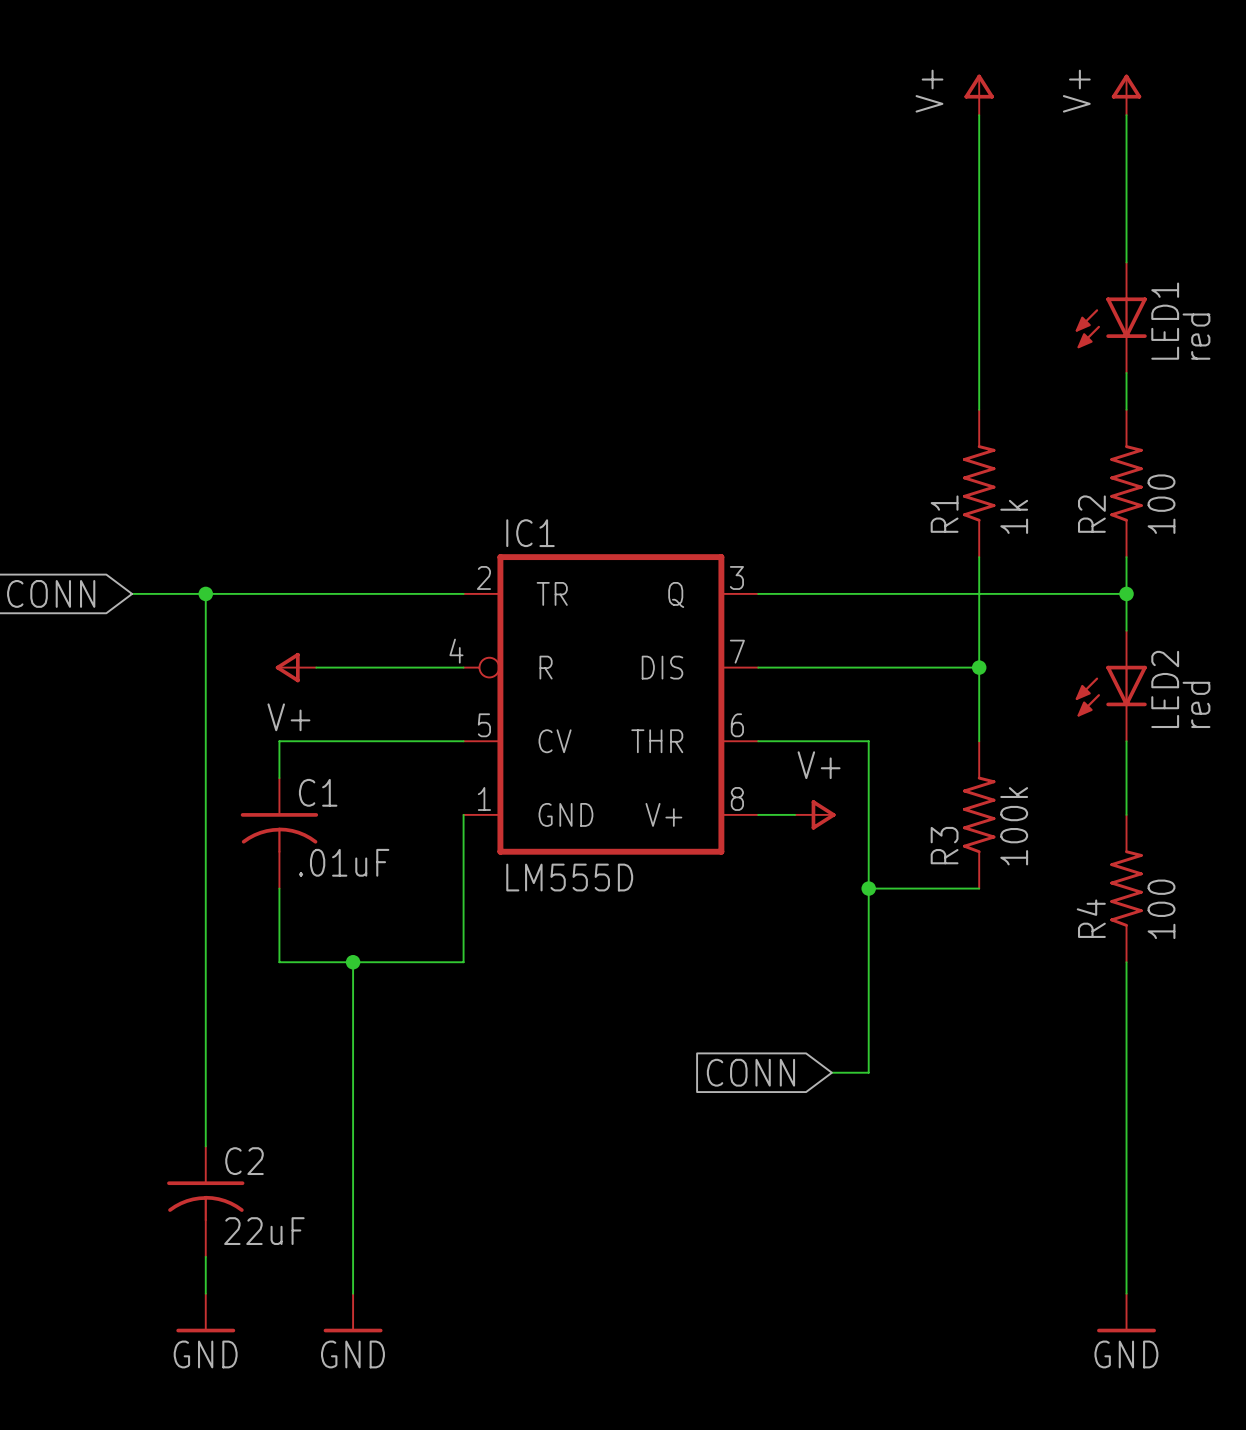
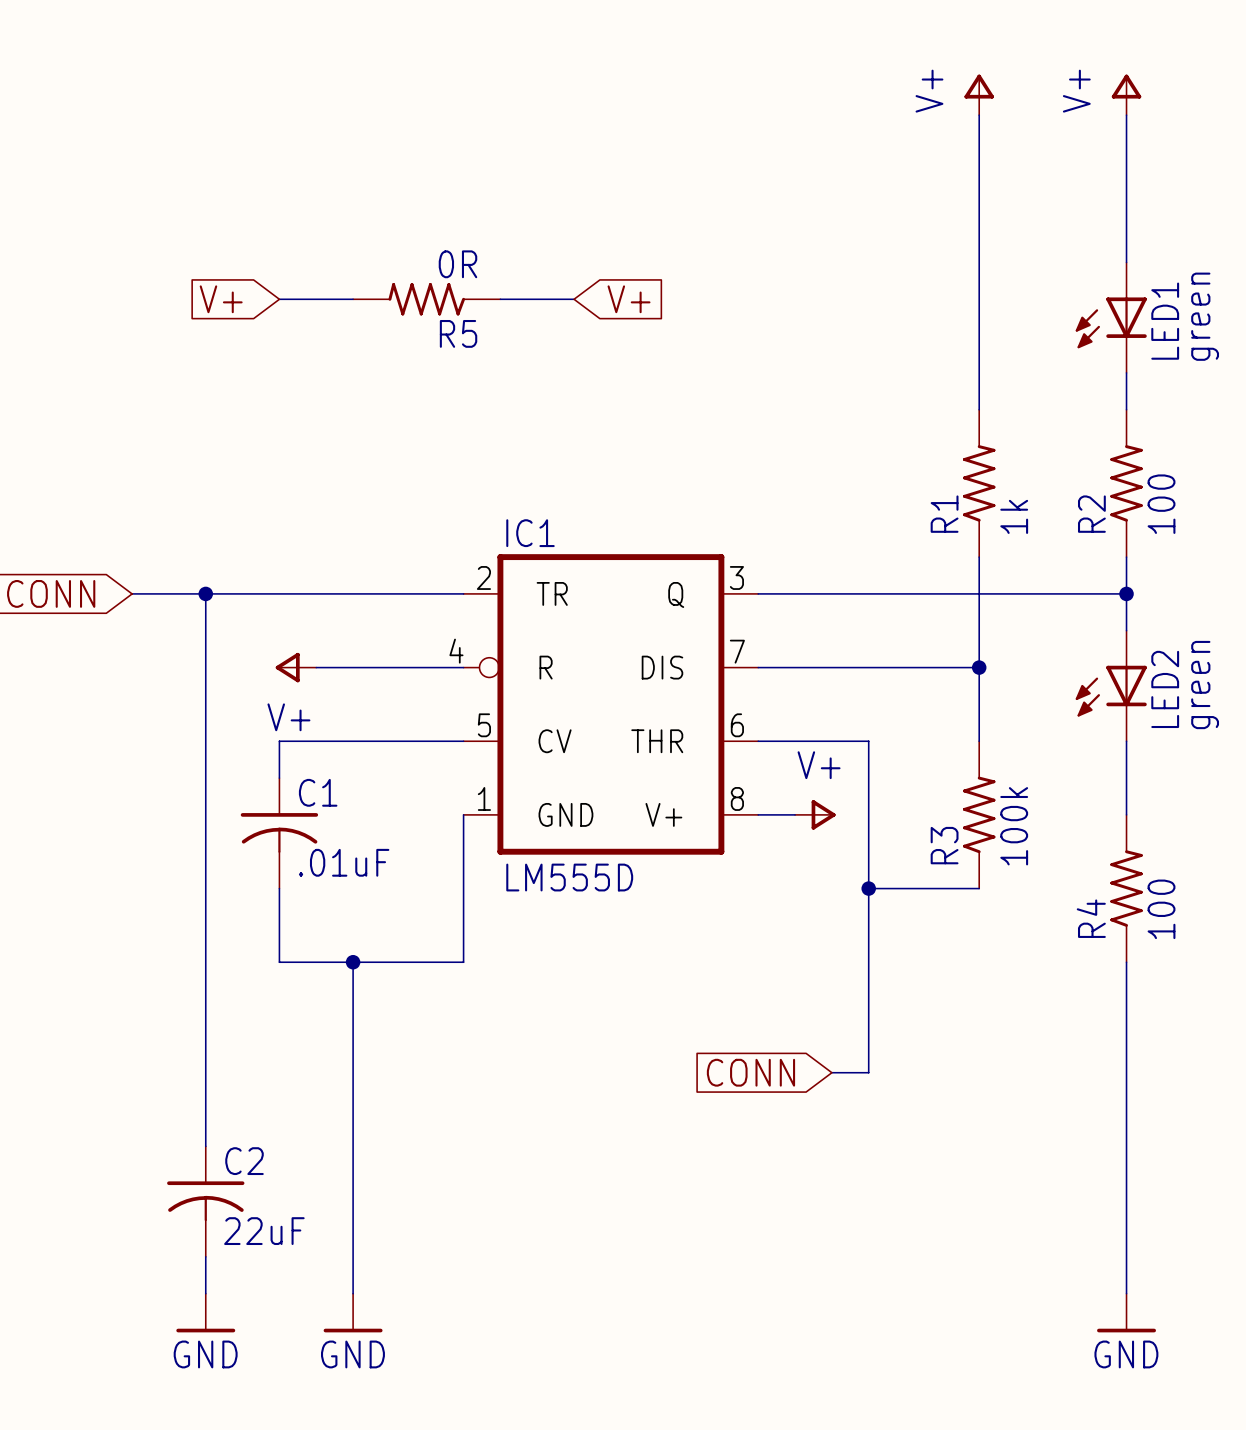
global label: none -> V+ (221, 299)
wire: none -> (279, 299) (353, 299)
R5: none -> 0R (426, 299)
wire: none -> (500, 299) (574, 299)
global label: none -> V+ (629, 299)
LED1 value: red (1196, 336) -> green (1205, 316)
LED2 value: red (1196, 704) -> green (1205, 685)

